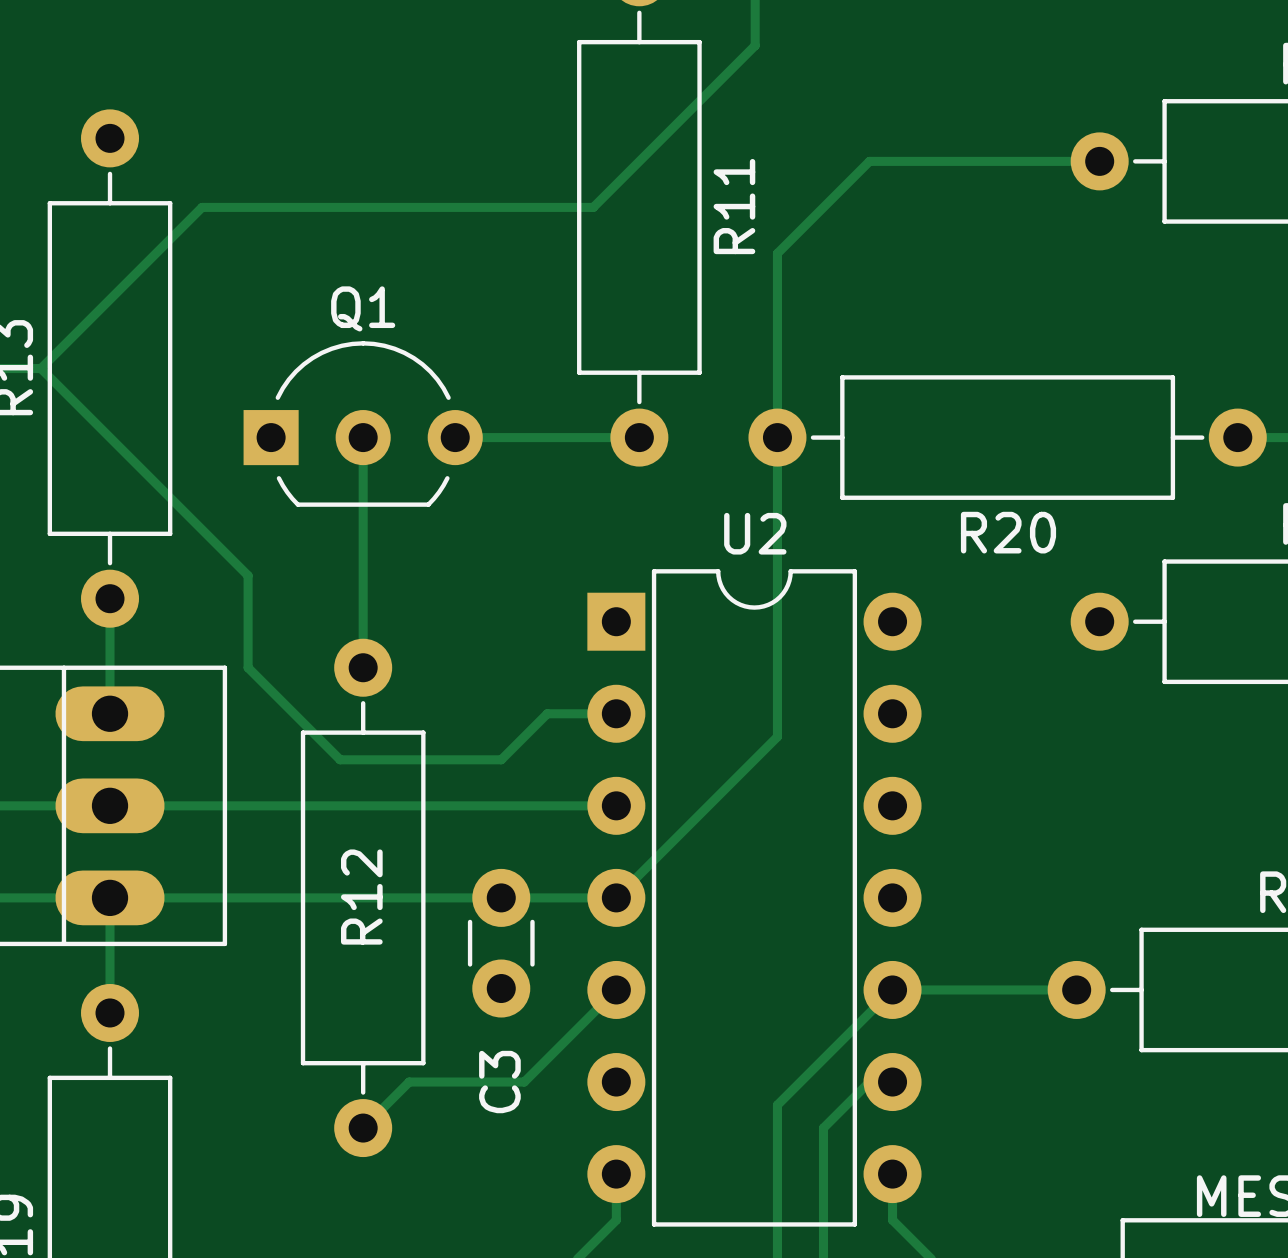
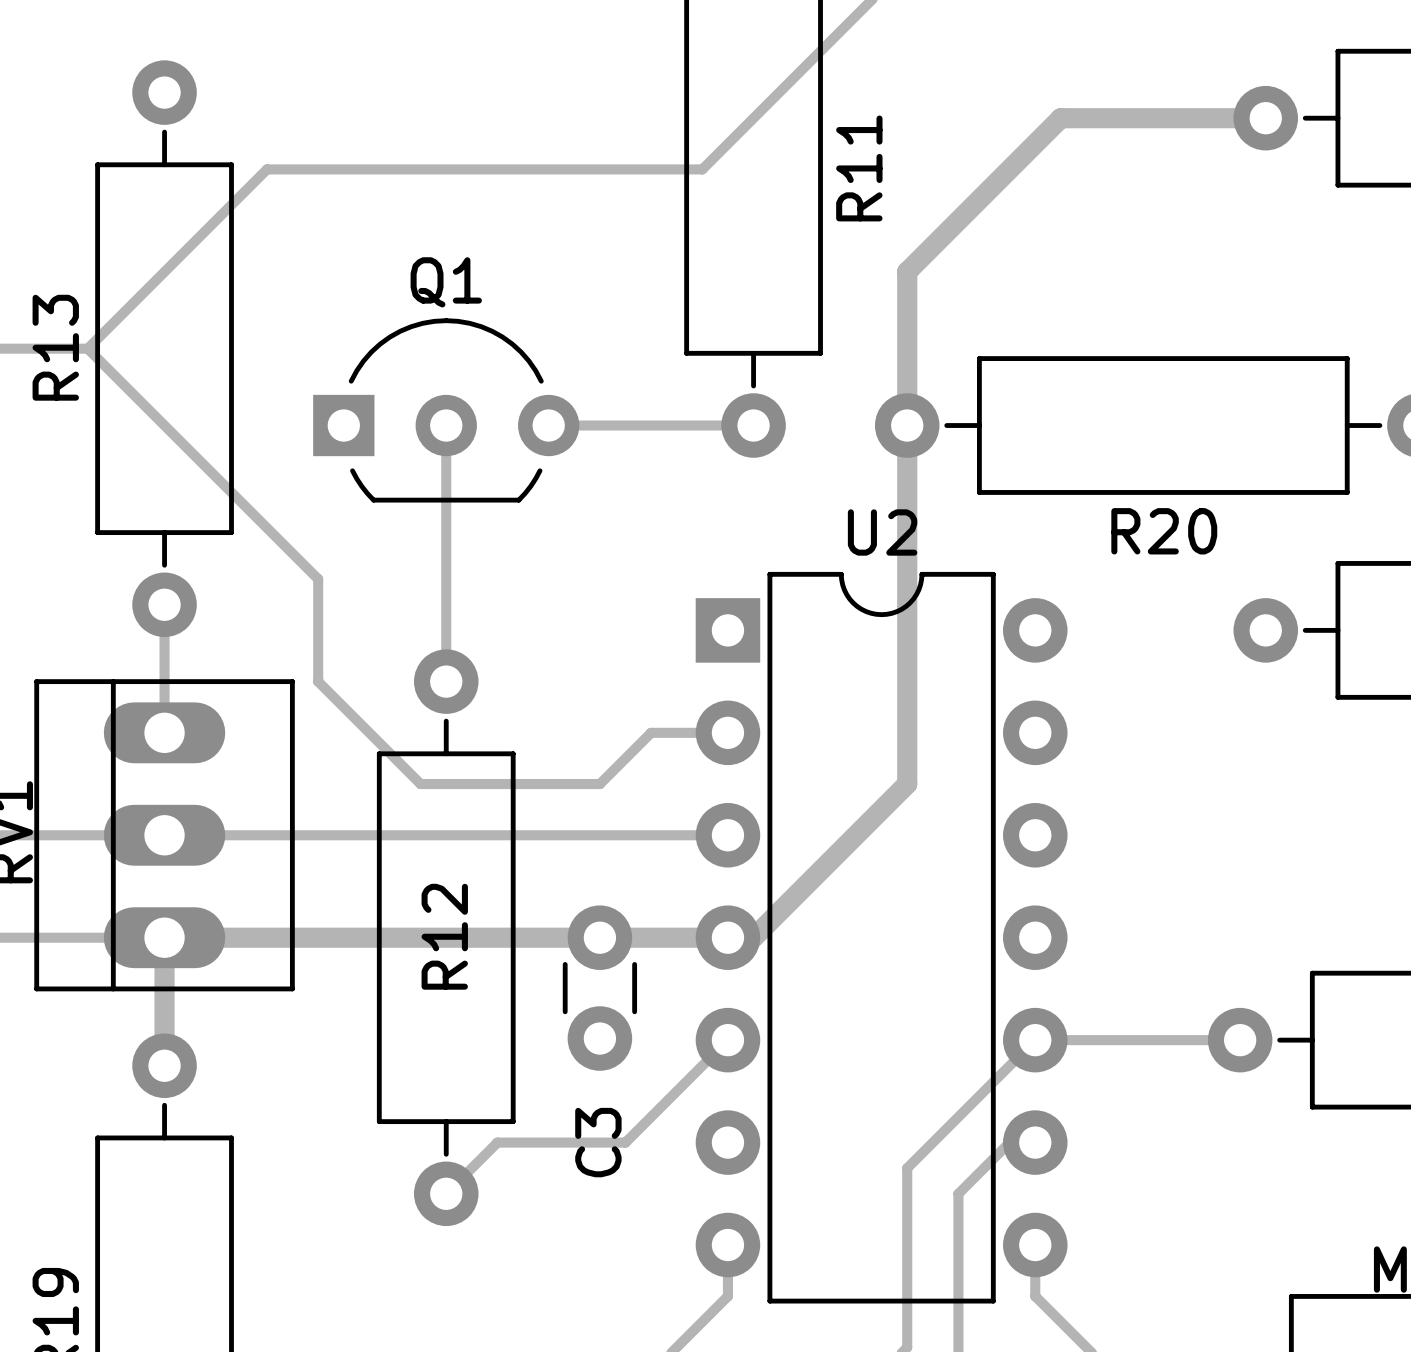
track: (915, 161) (869, 161) (777, 253) (777, 299) -> (1060, 118) (907, 271)
track width: thin (915, 161) (1099, 161) -> thick (1060, 118) (1265, 118)
track width: thin (777, 299) (777, 736) -> thick (907, 271) (907, 758)
track: (777, 736) (616, 897) -> (907, 758) (907, 784) (753, 937) (599, 937)
track width: thin (501, 897) (110, 897) (110, 1012) -> thick (599, 937) (164, 937) (164, 1065)

